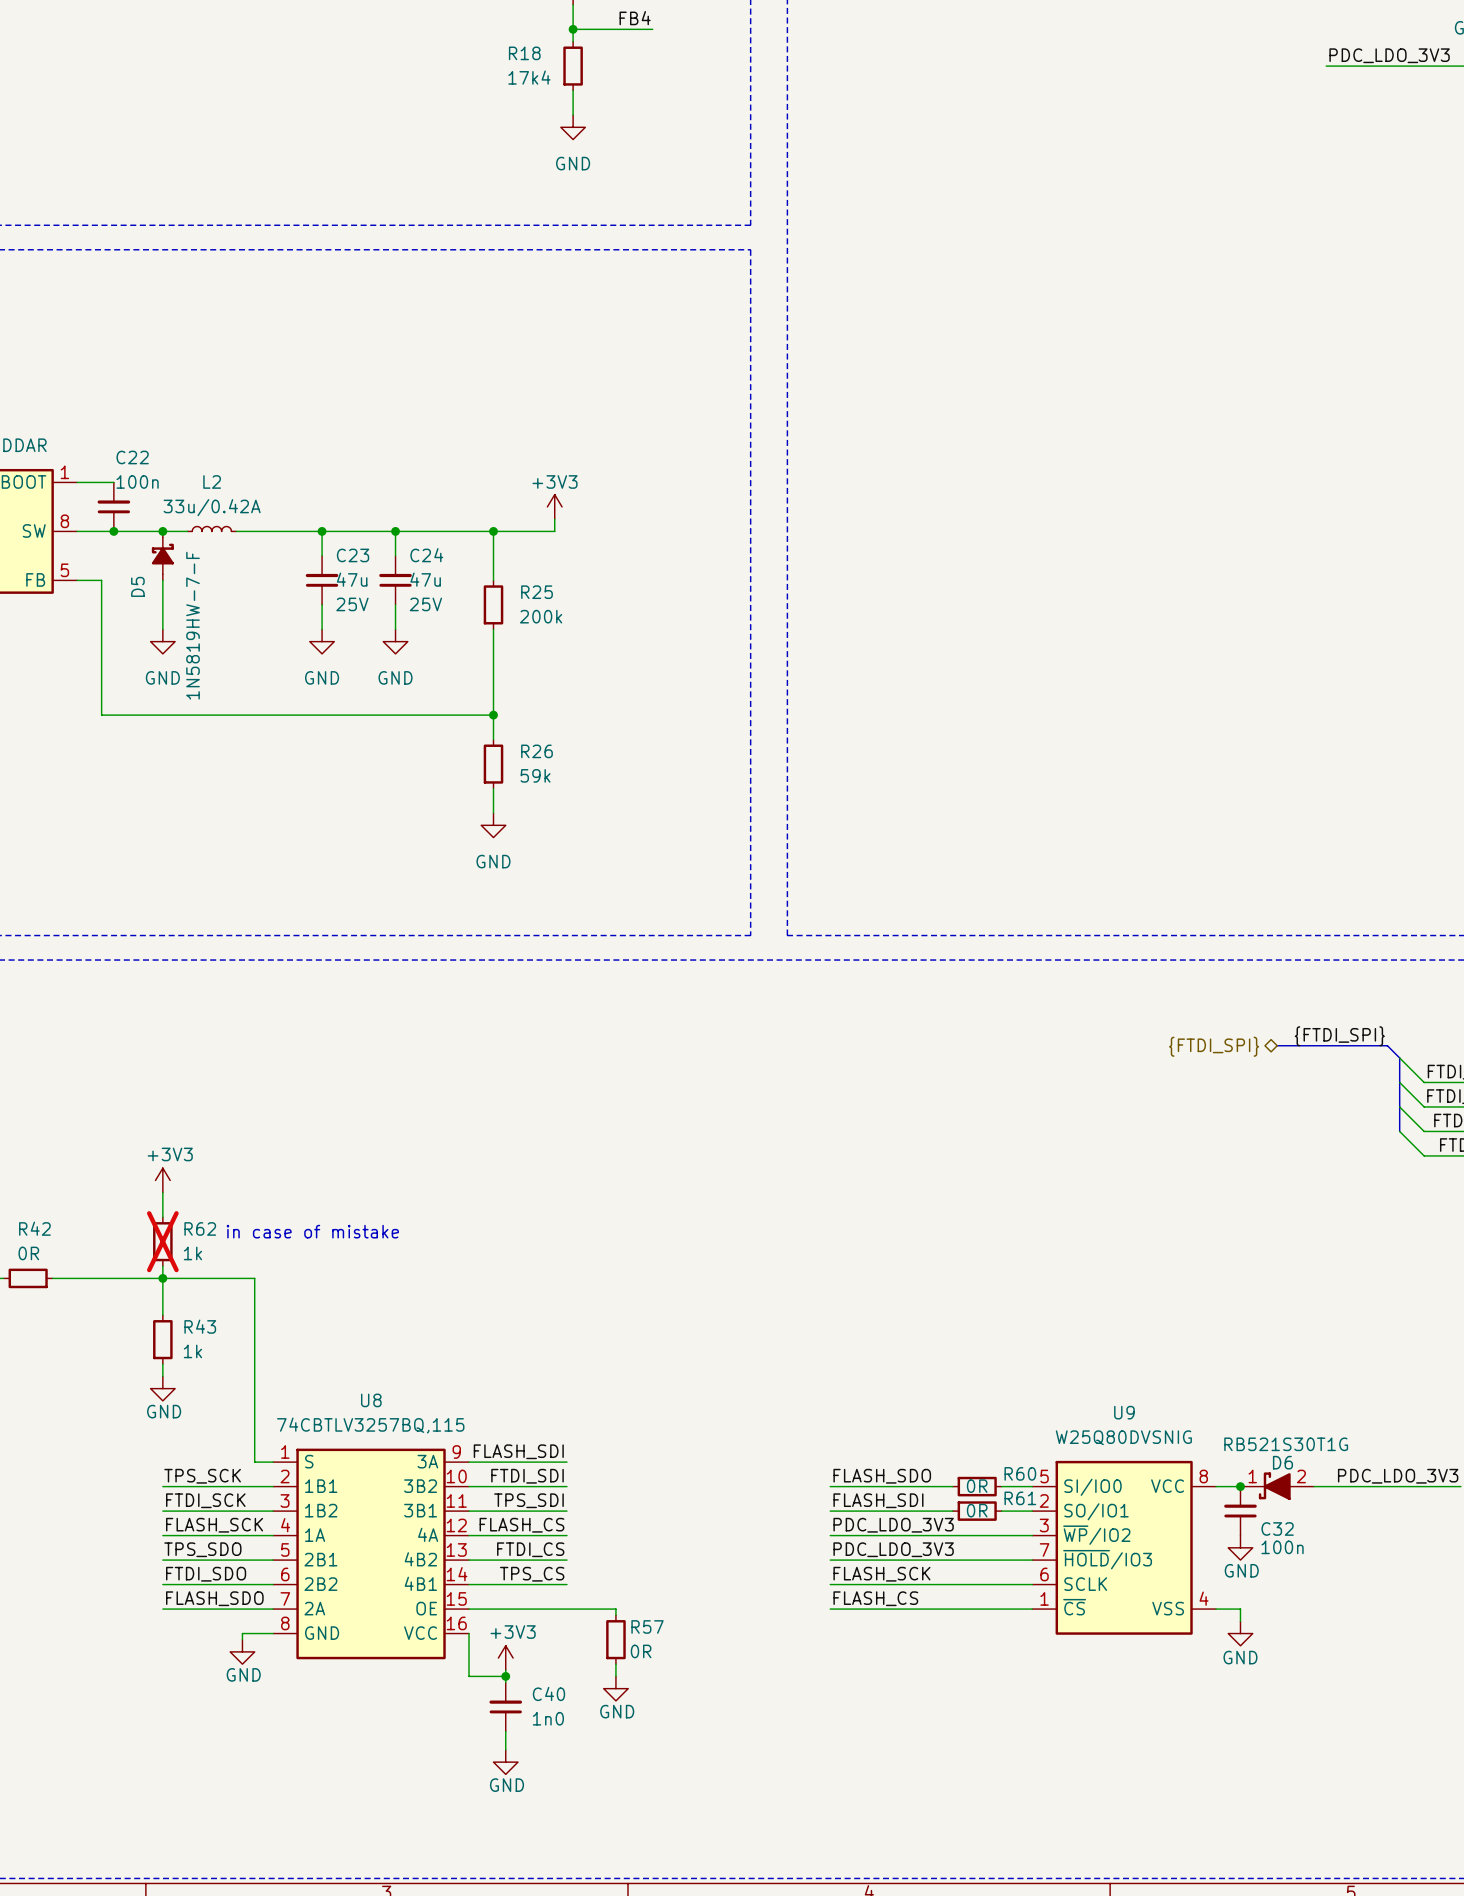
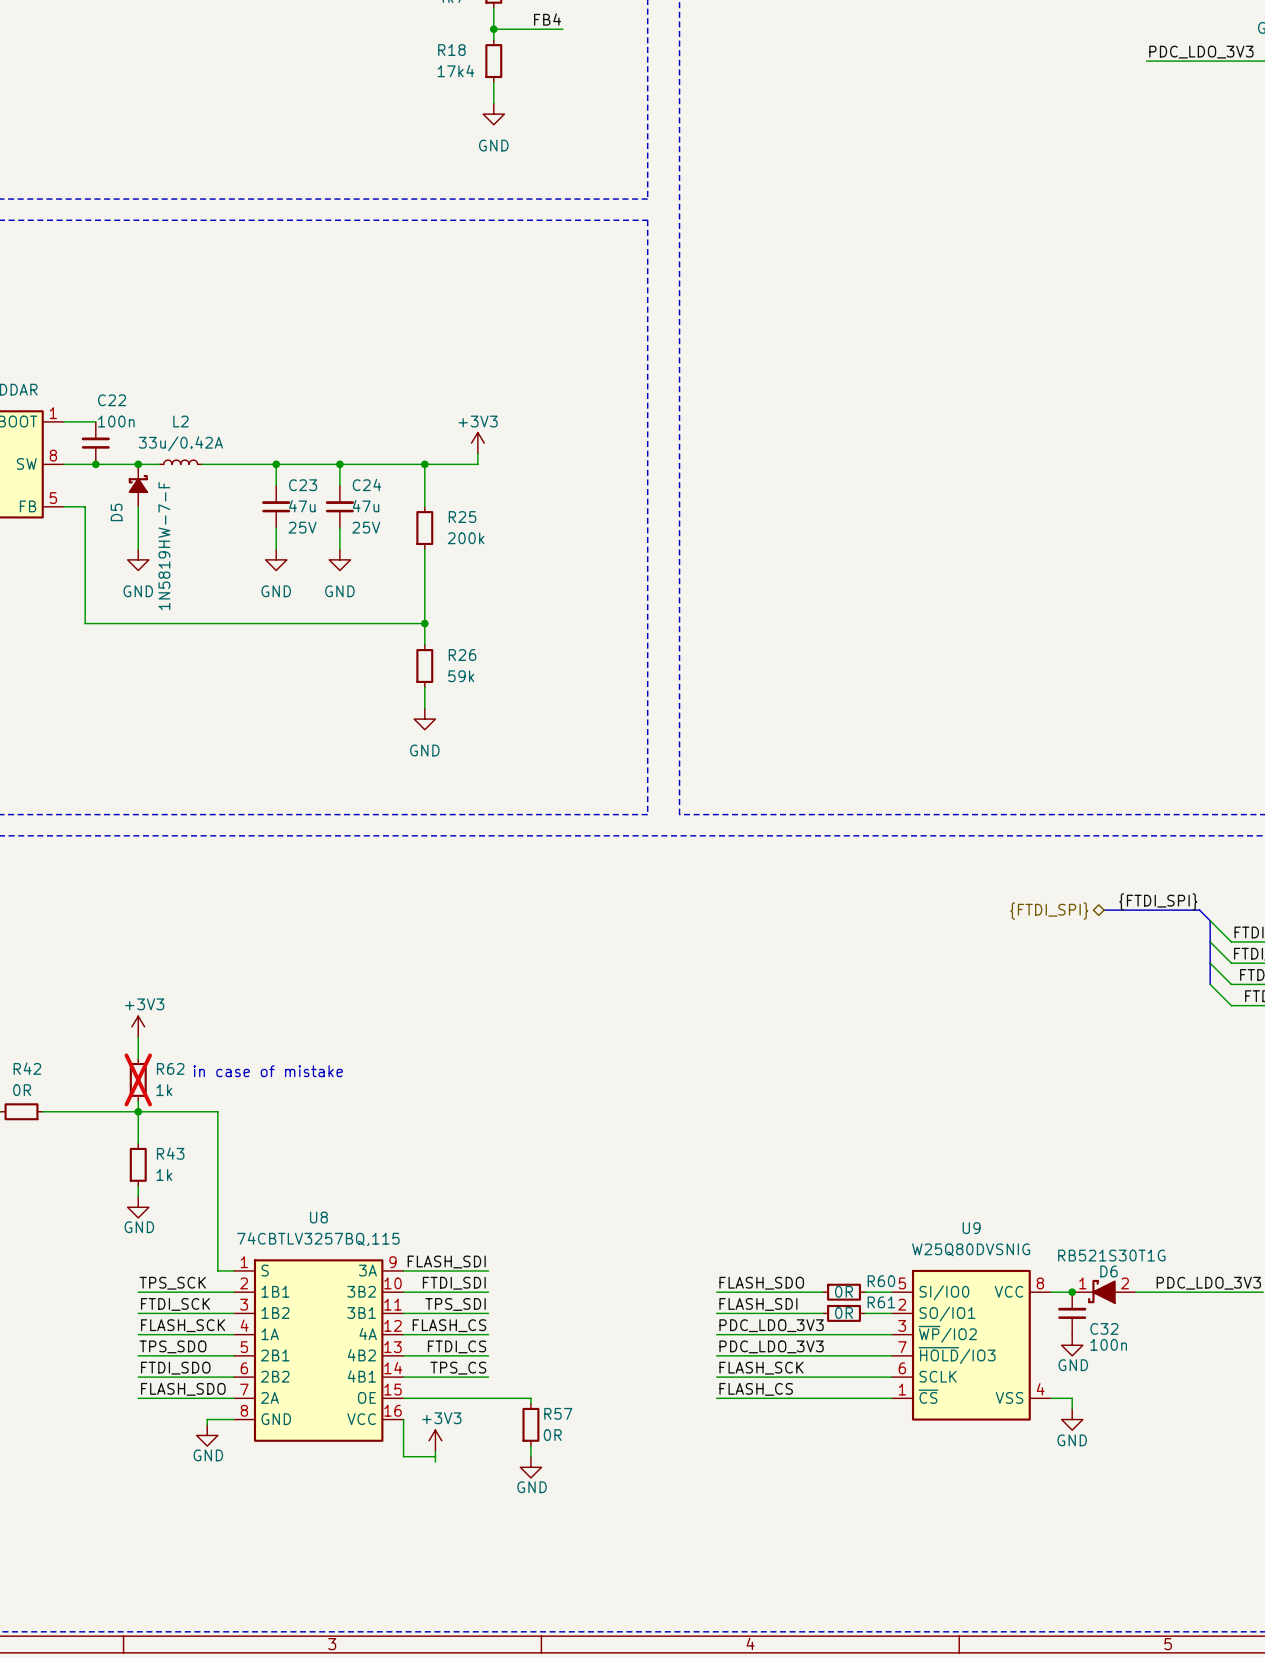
junction: (505, 1676) -> none
C40: (505, 1707) -> none
wire: (505, 1731) (505, 1749) -> none
power symbol: GND (505, 1762) -> none

